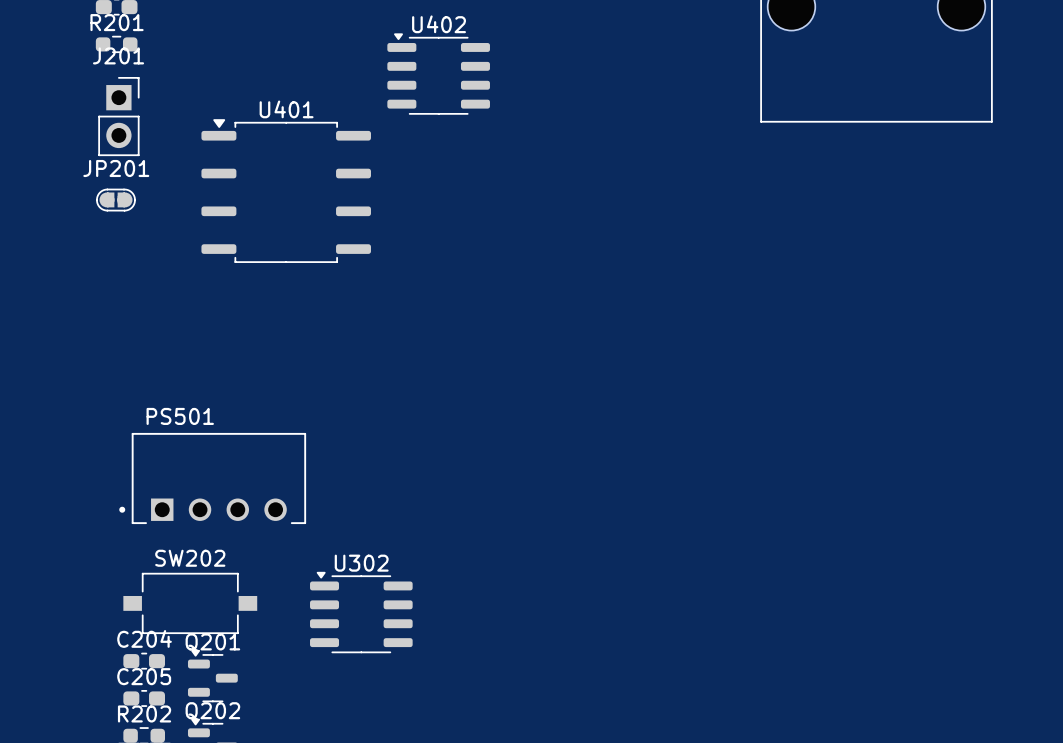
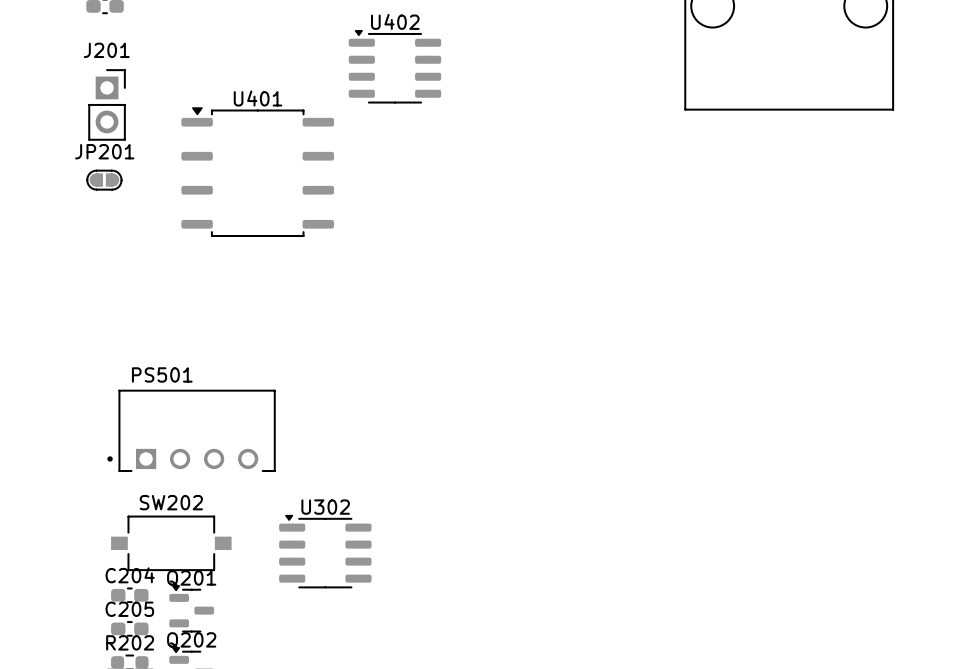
R201: (116, 44) -> none

